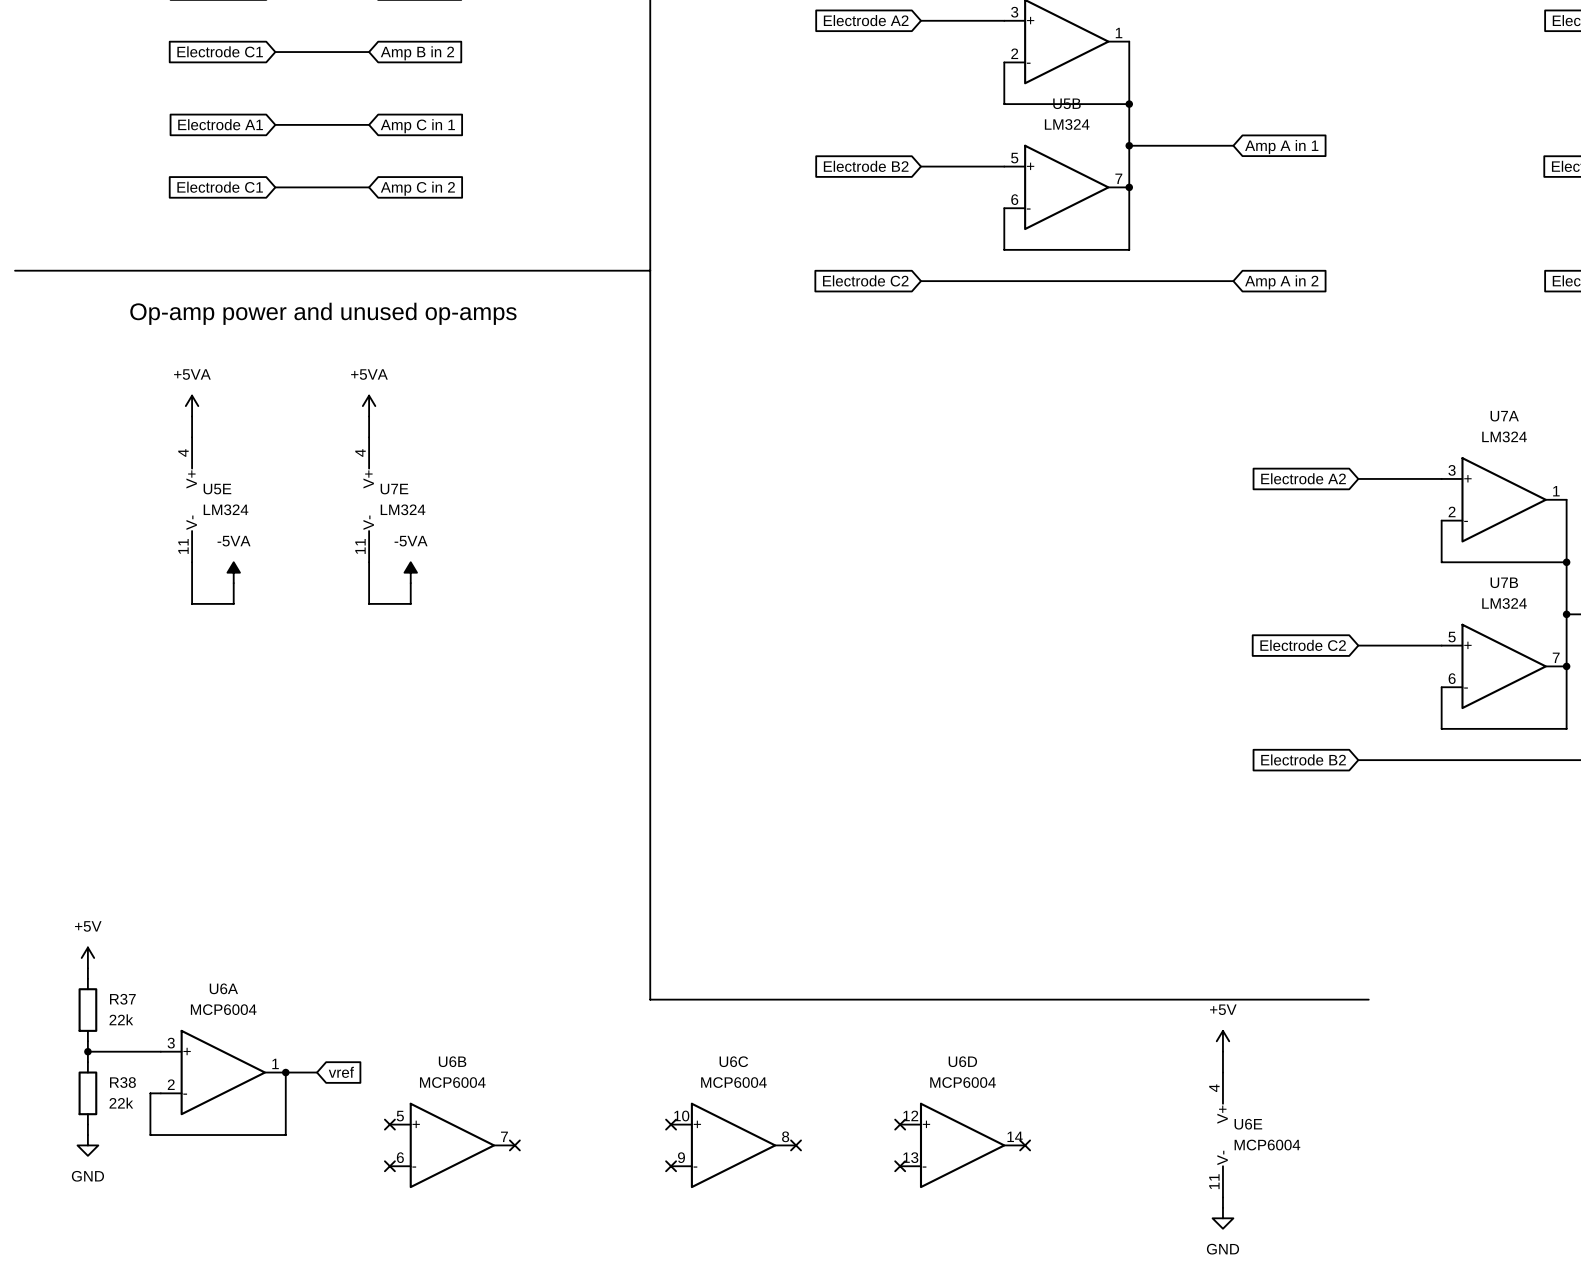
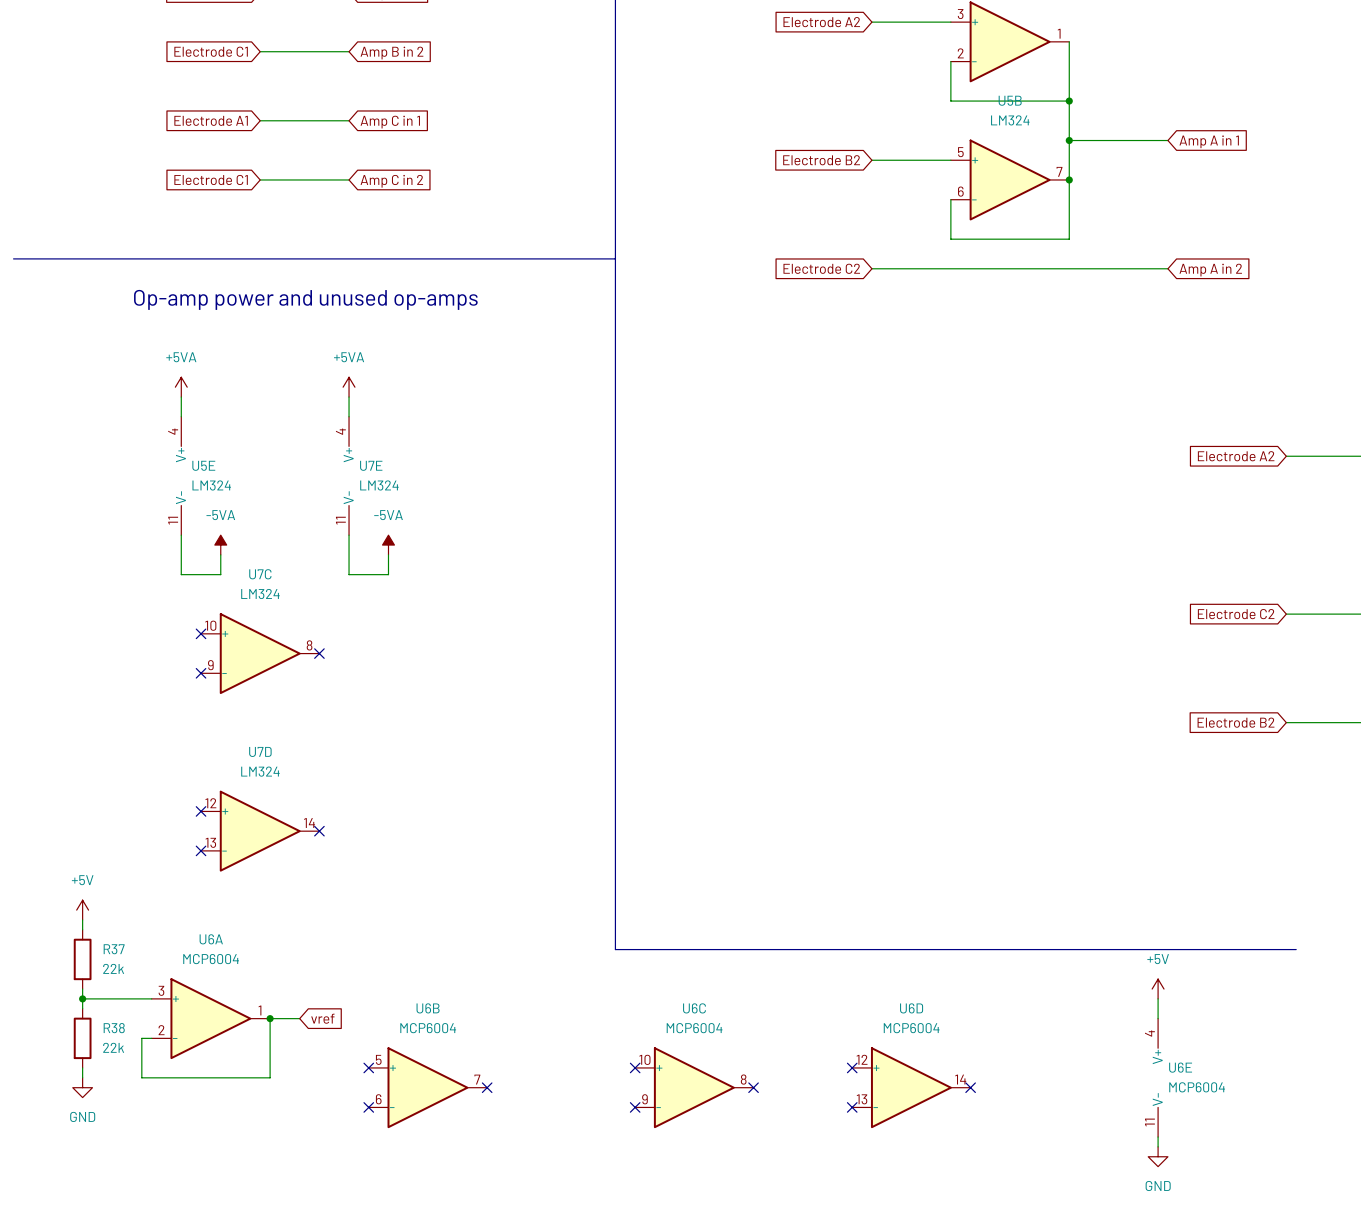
no-connect mark: none -> (201, 633)
U7C: none -> LM324 (260, 653)
no-connect mark: none -> (319, 653)
no-connect mark: none -> (201, 673)
no-connect mark: none -> (201, 811)
U7D: none -> LM324 (260, 831)
no-connect mark: none -> (319, 831)
no-connect mark: none -> (201, 850)

